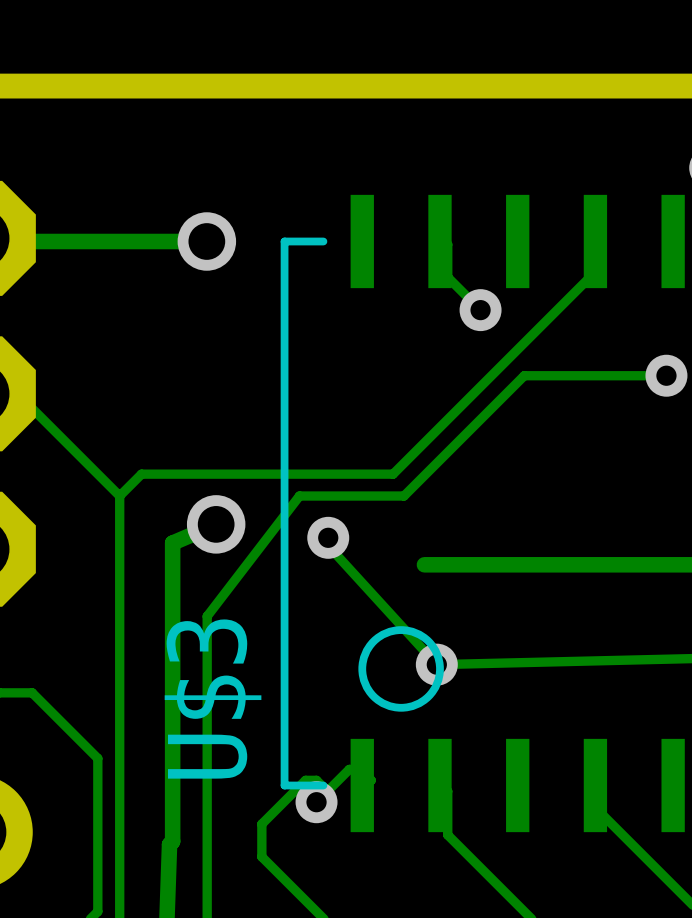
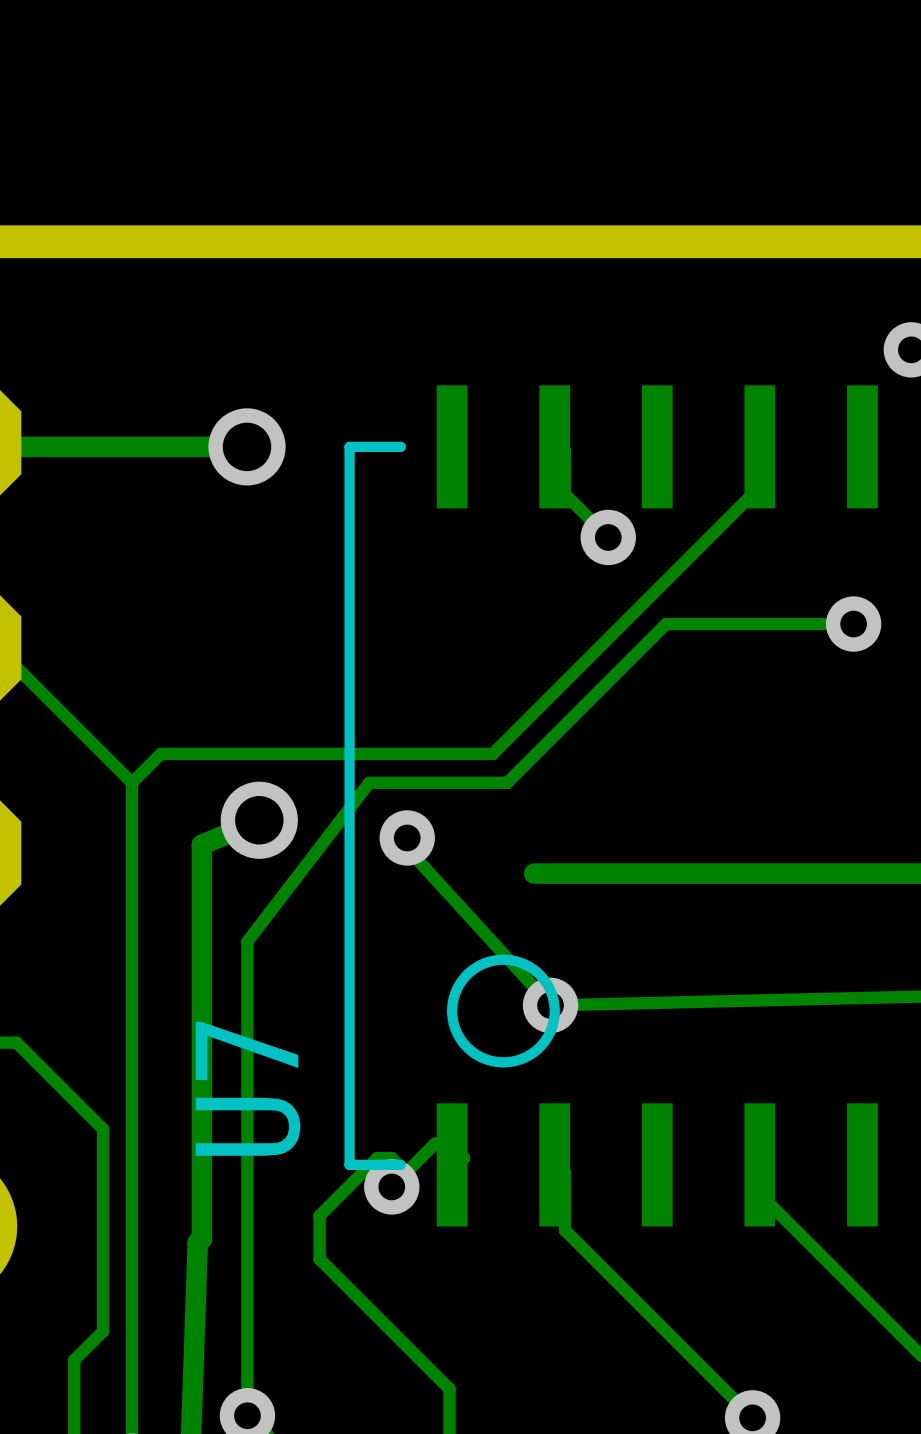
U$3 name: U$3 (213, 699) -> U7 (248, 1088)

